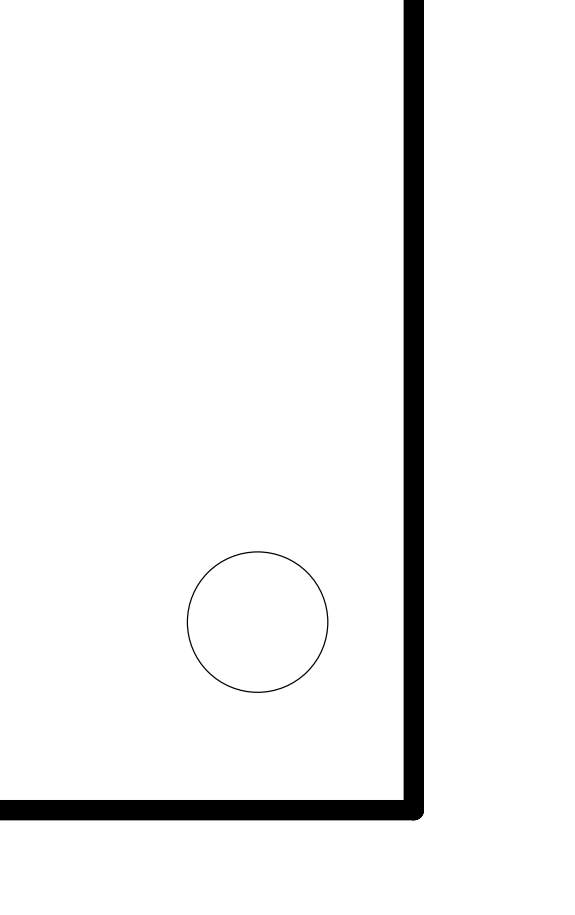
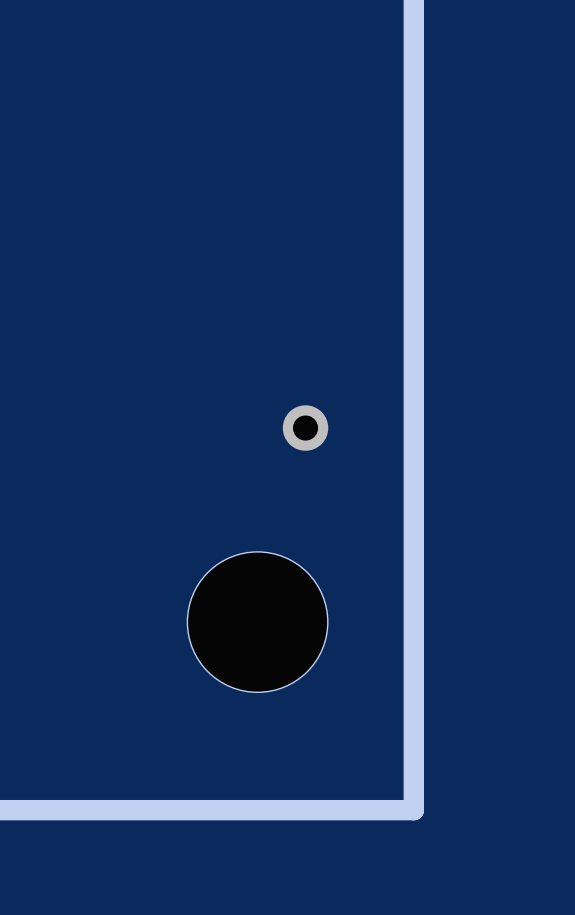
via: none -> (305, 428)

